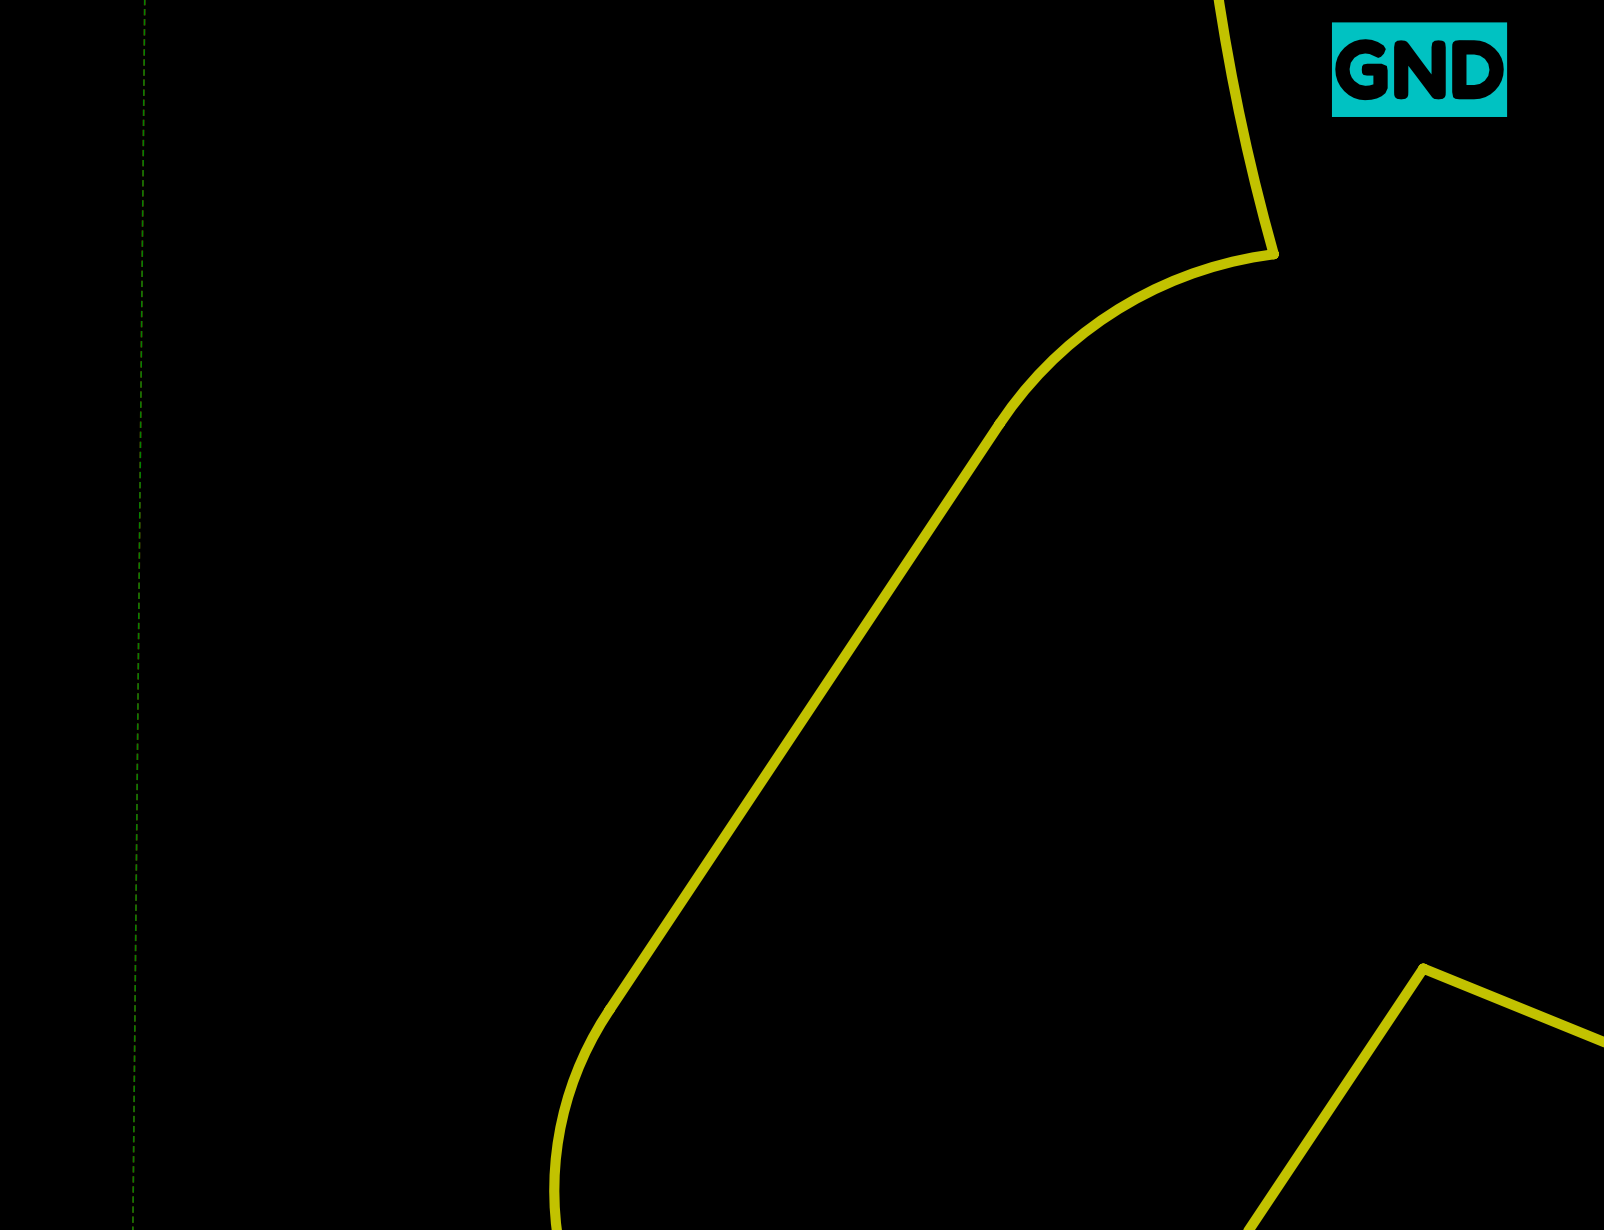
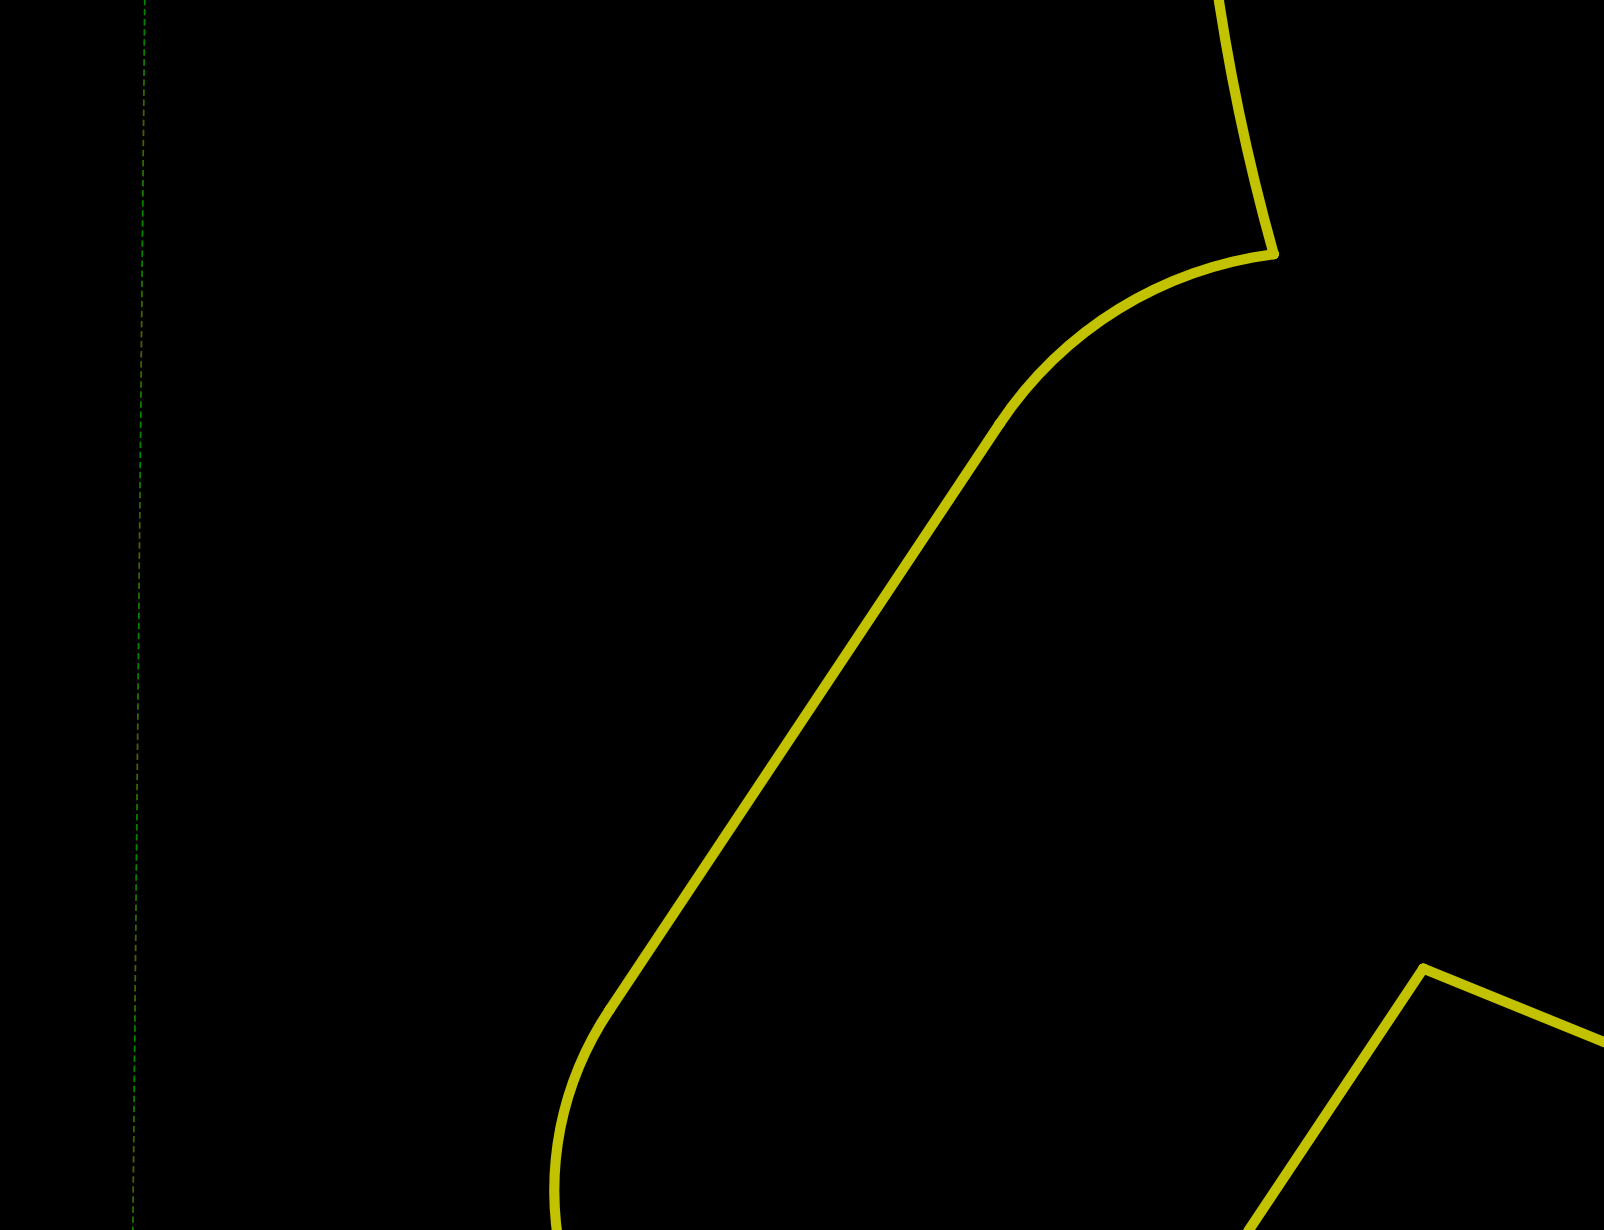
drawing: [1331, 22, 1508, 117] -> none

